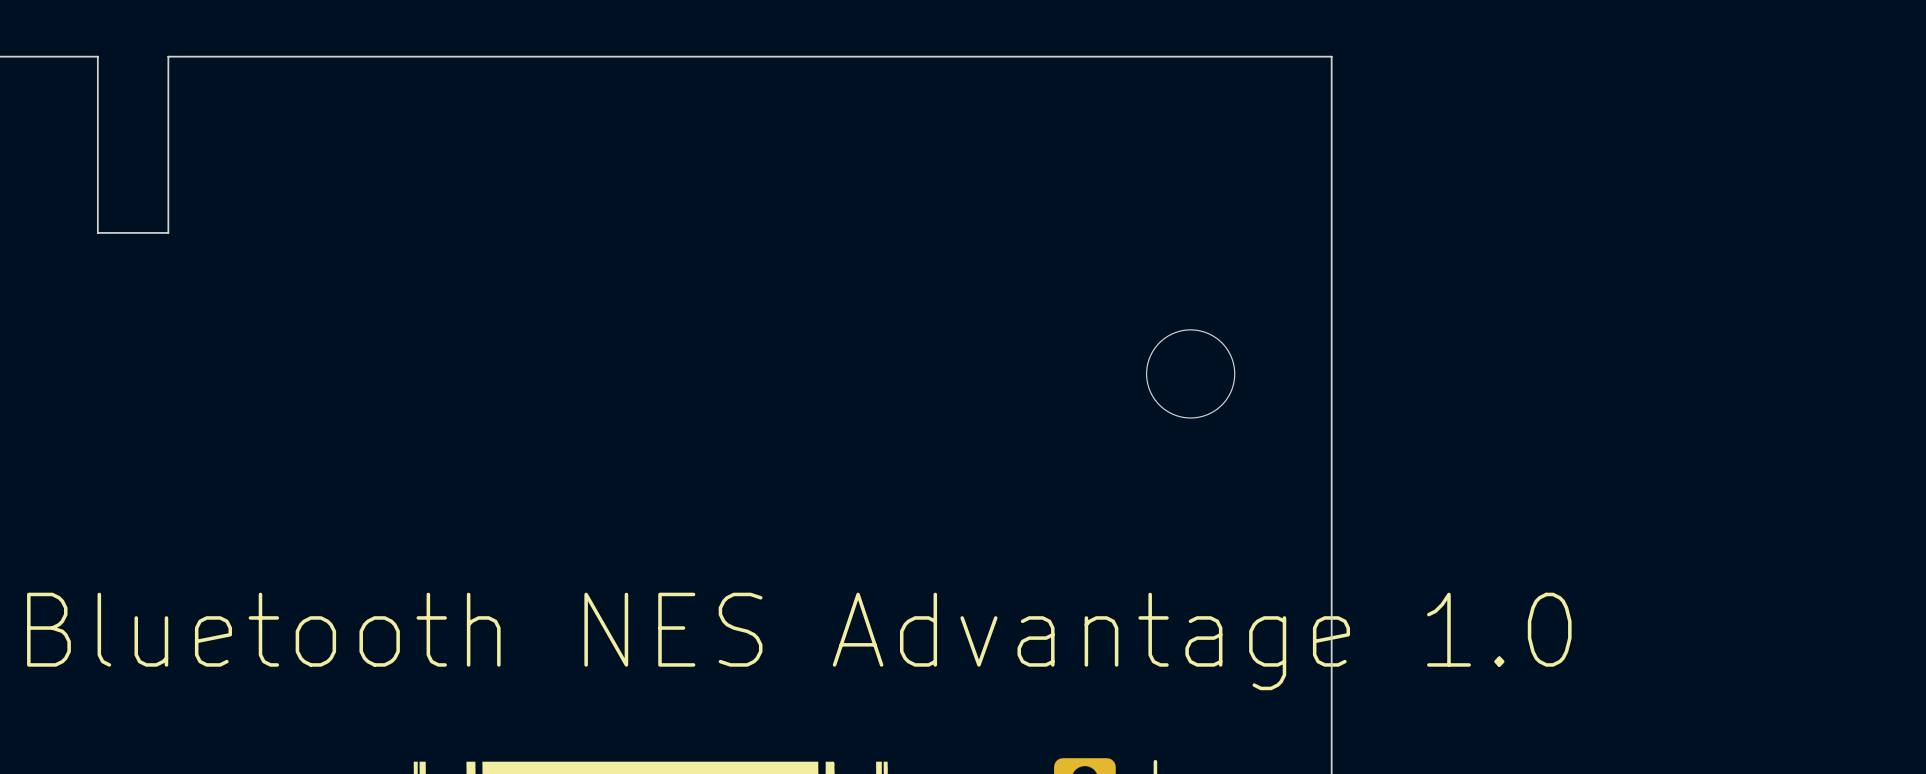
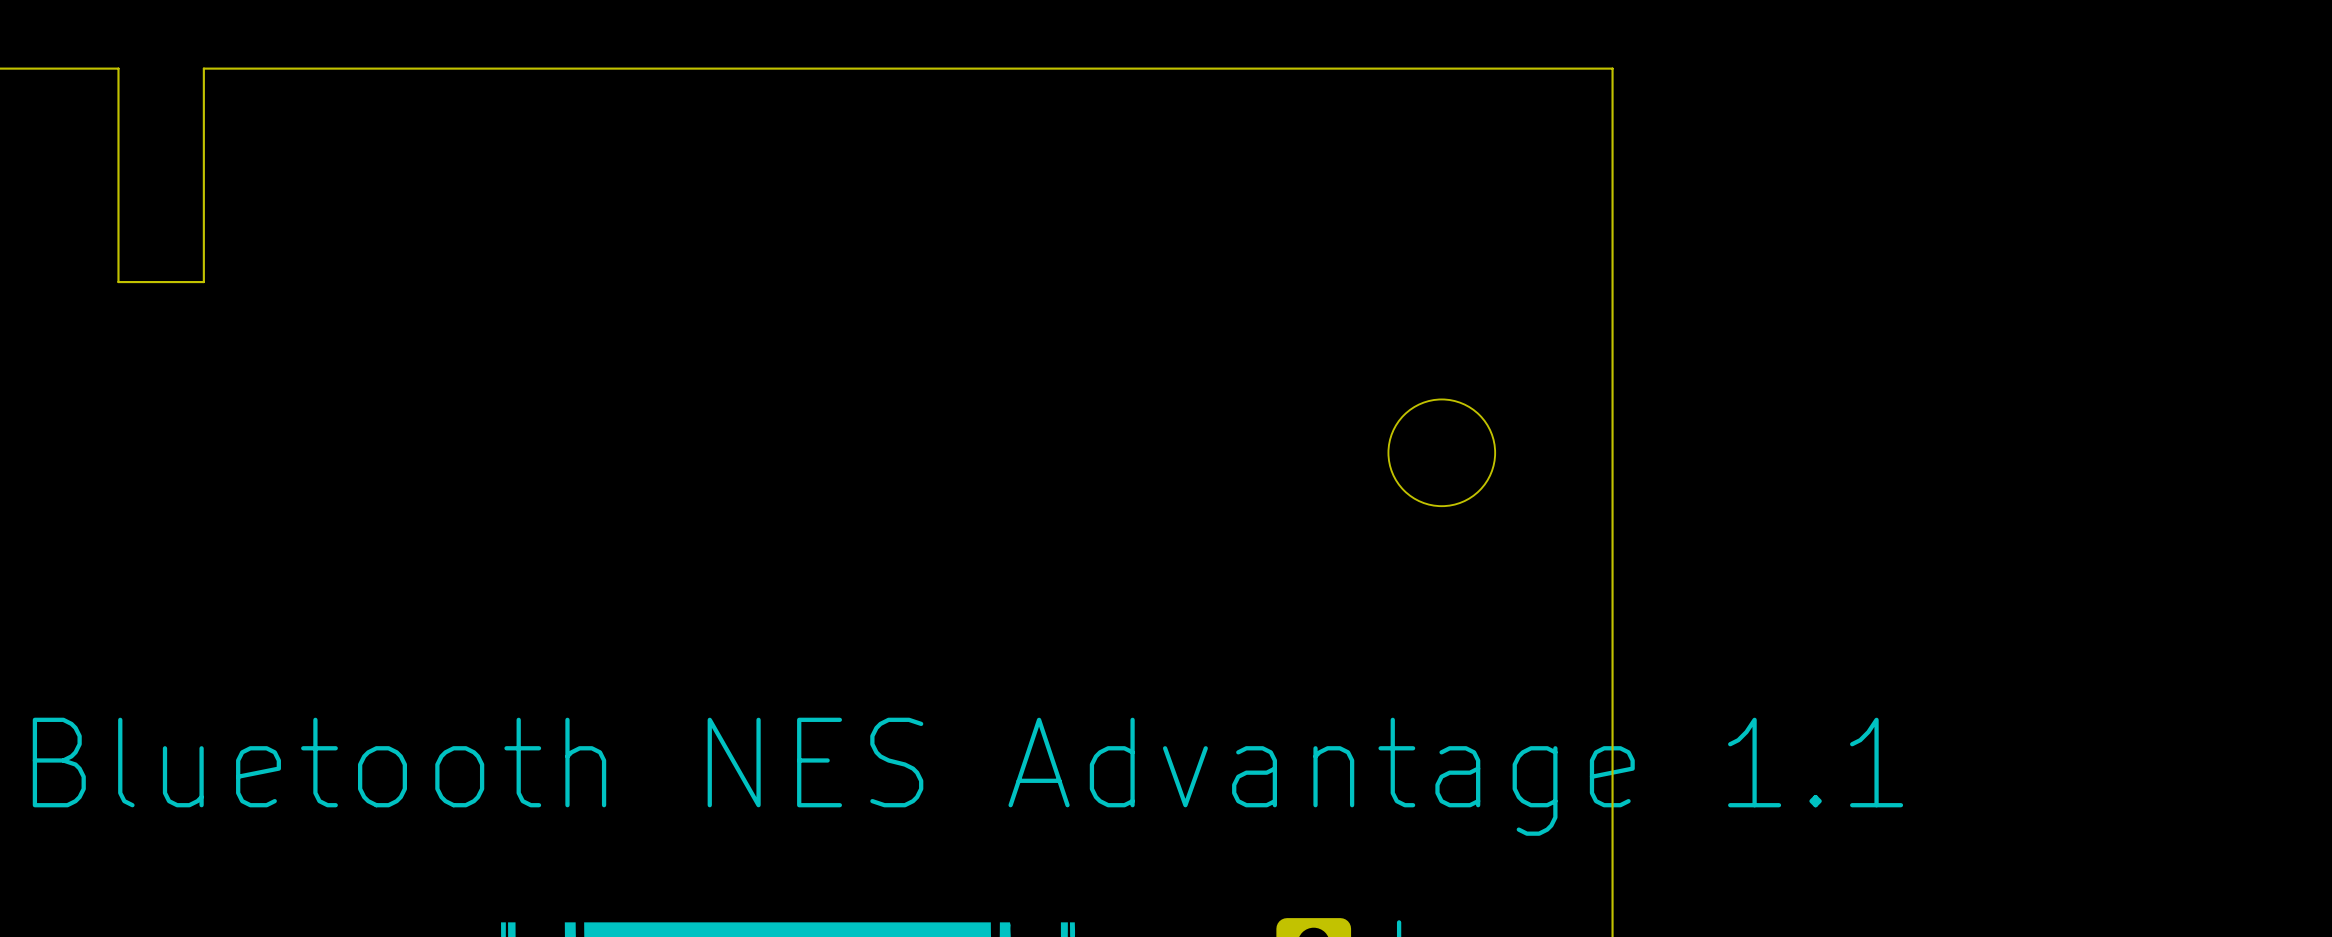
text: Bluetooth NES Advantage 1.0 (799, 641) -> Bluetooth NES Advantage 1.1 (967, 776)

